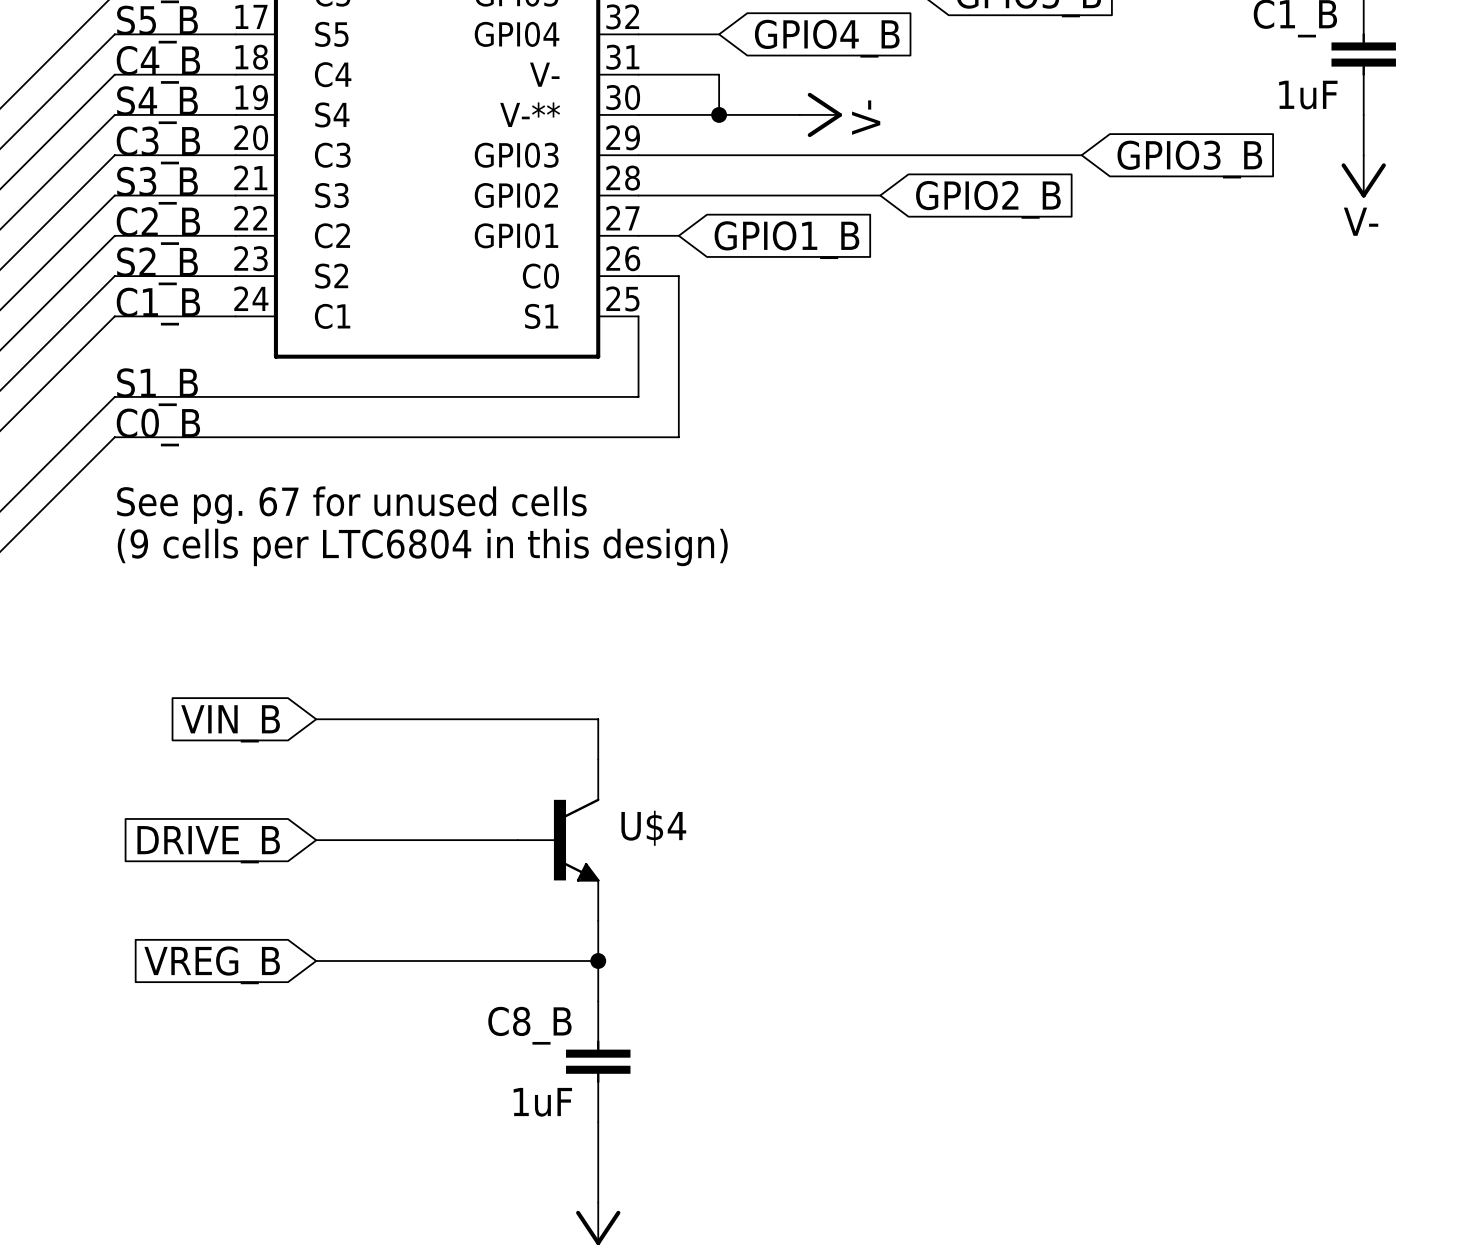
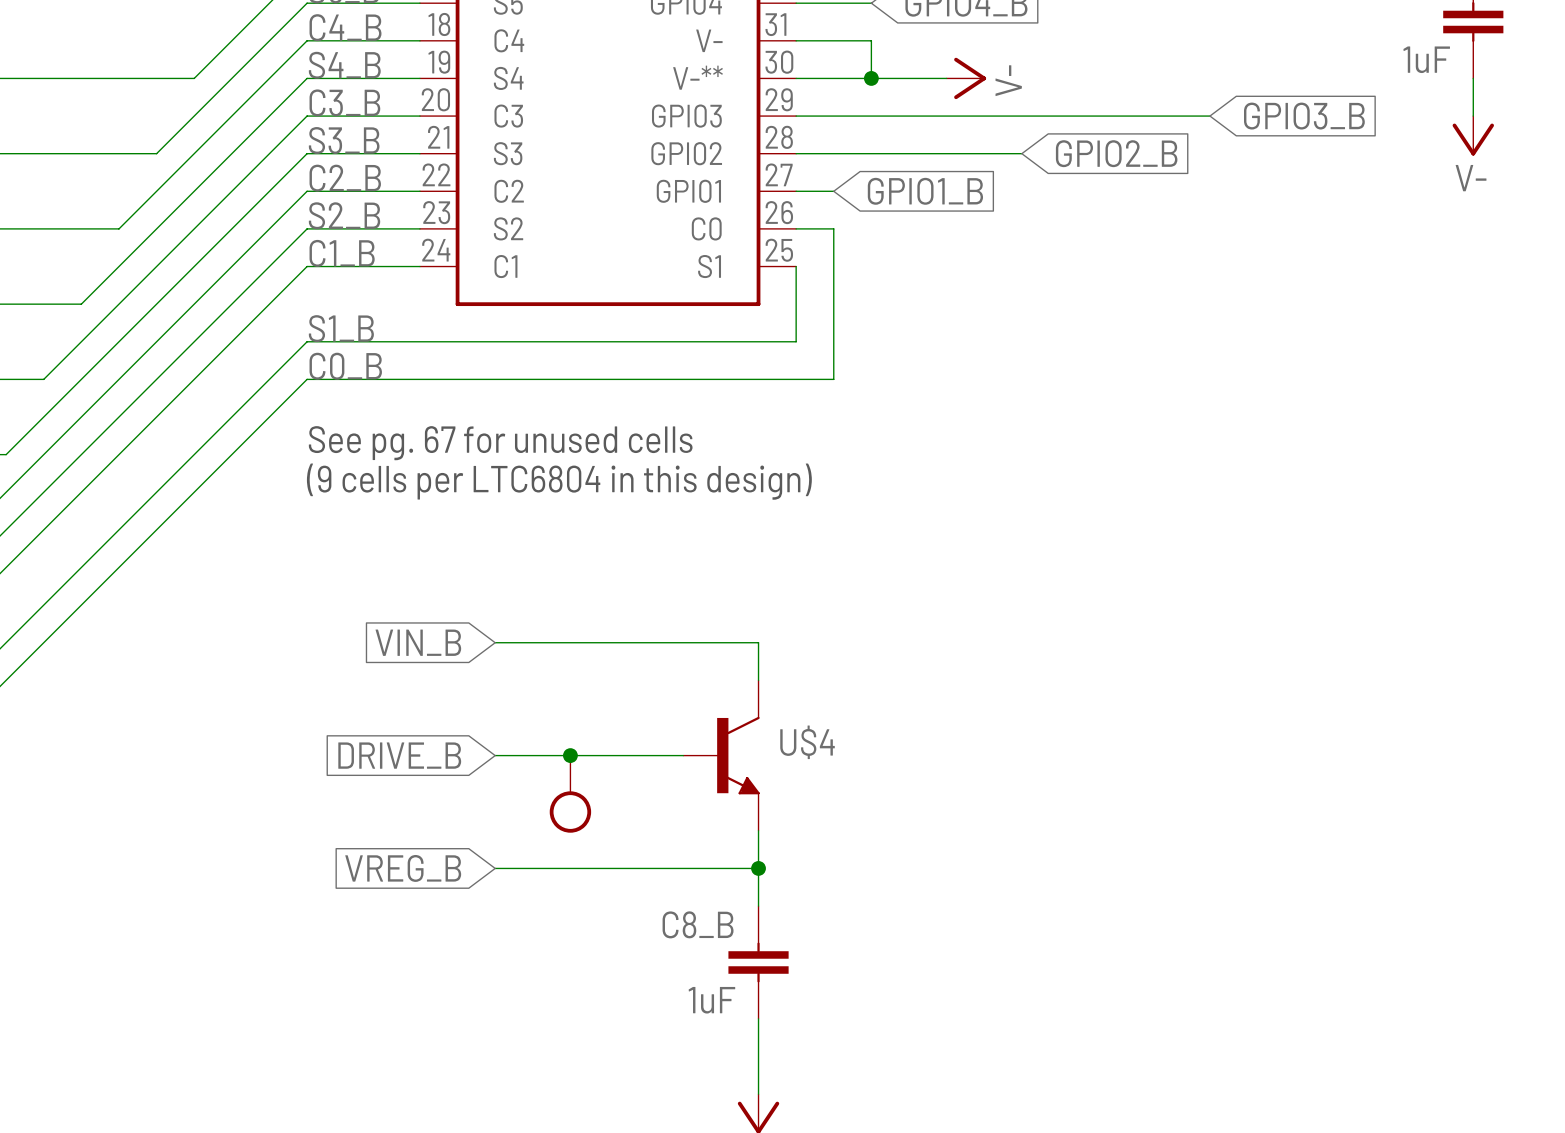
junction: none -> (570, 755)
part: none -> (570, 794)

